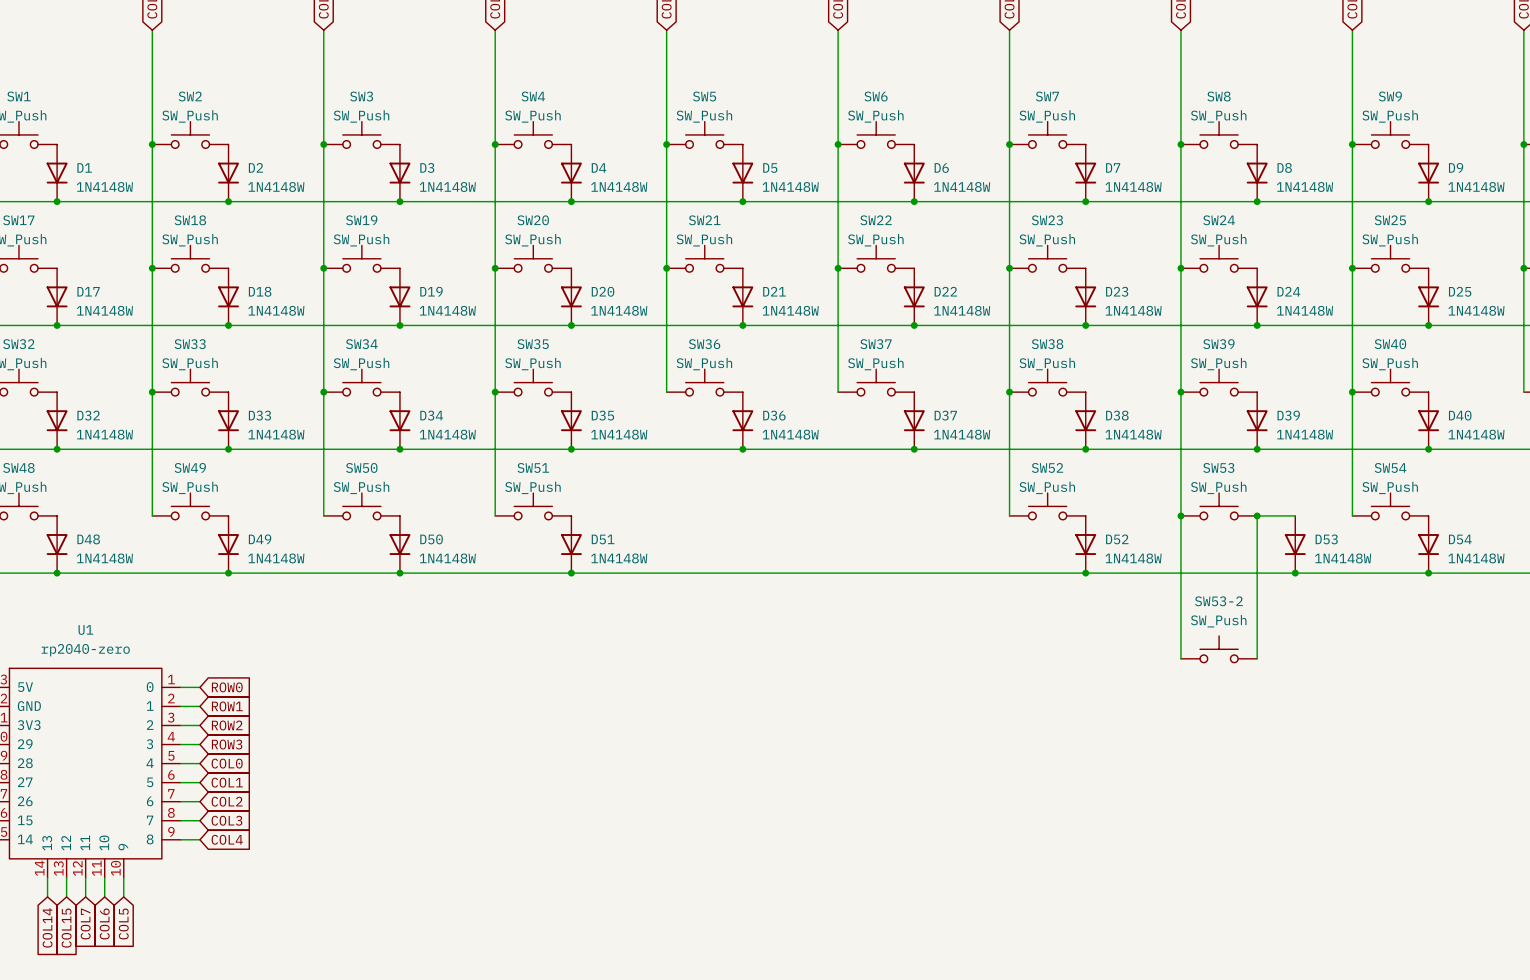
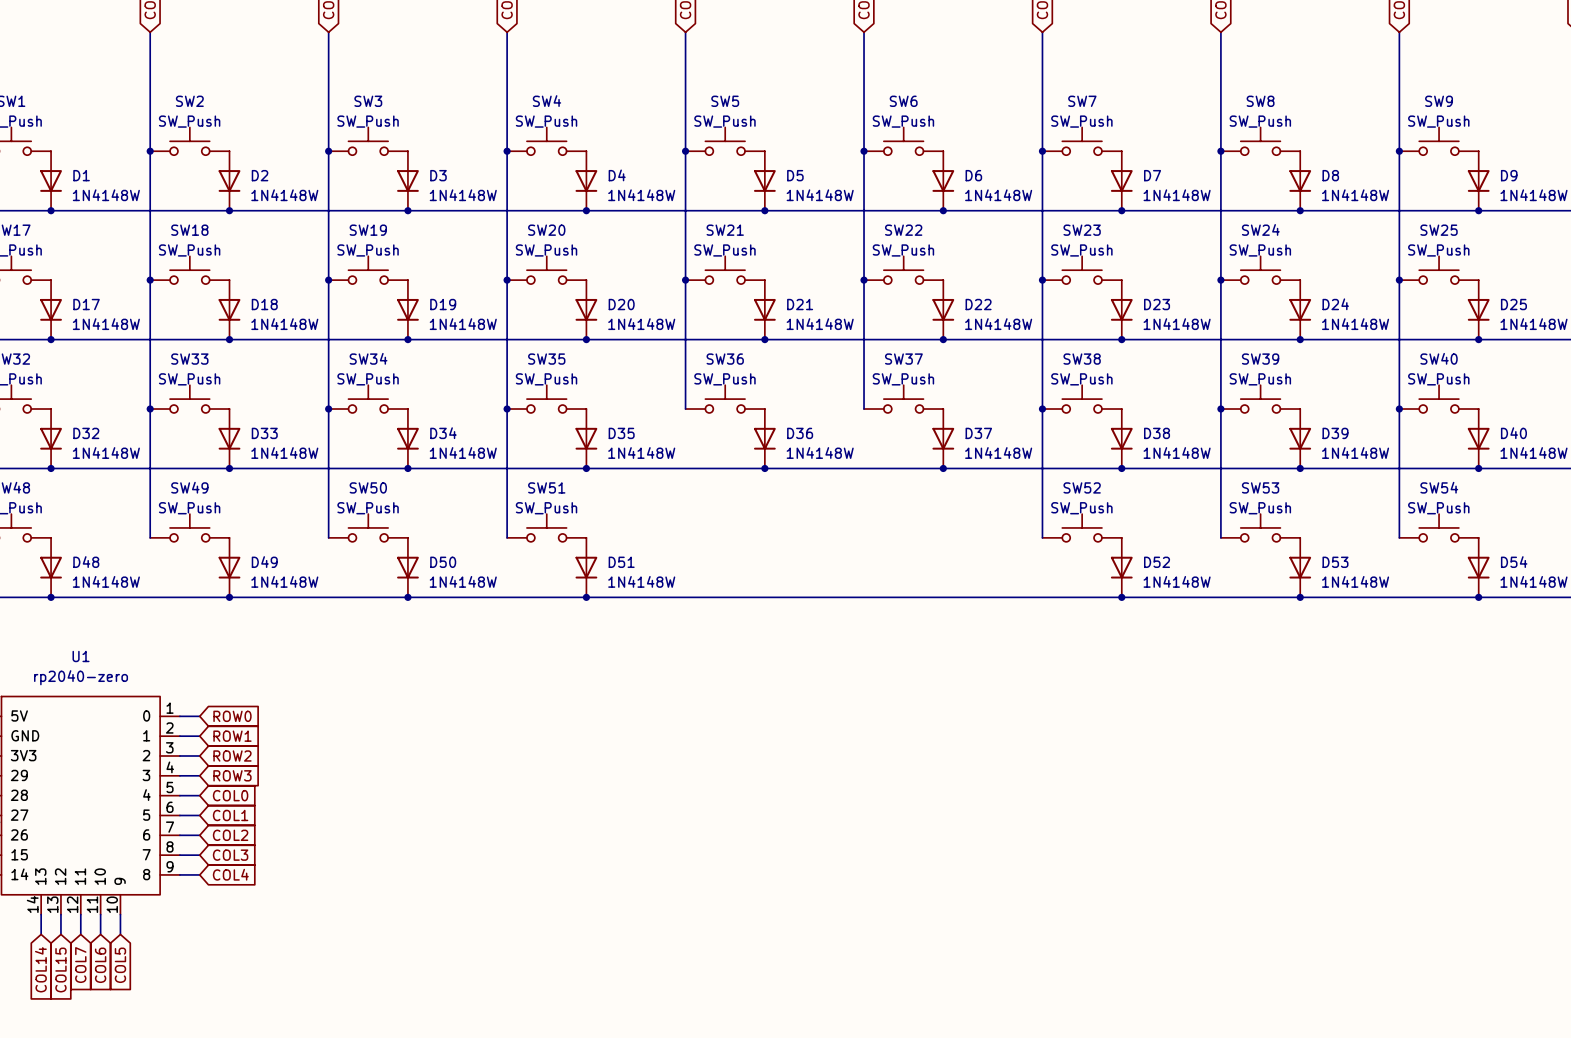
wire: (1180, 515) (1180, 658) -> none
junction: (1180, 515) -> none
junction: (1257, 515) -> none
wire: (1295, 515) (1257, 515) (1257, 658) -> none
D53 position: (1295, 544) -> (1300, 567)
junction: none -> (1300, 597)
junction: (1295, 573) -> none
SW53-2: SW_Push (1219, 649) -> none

